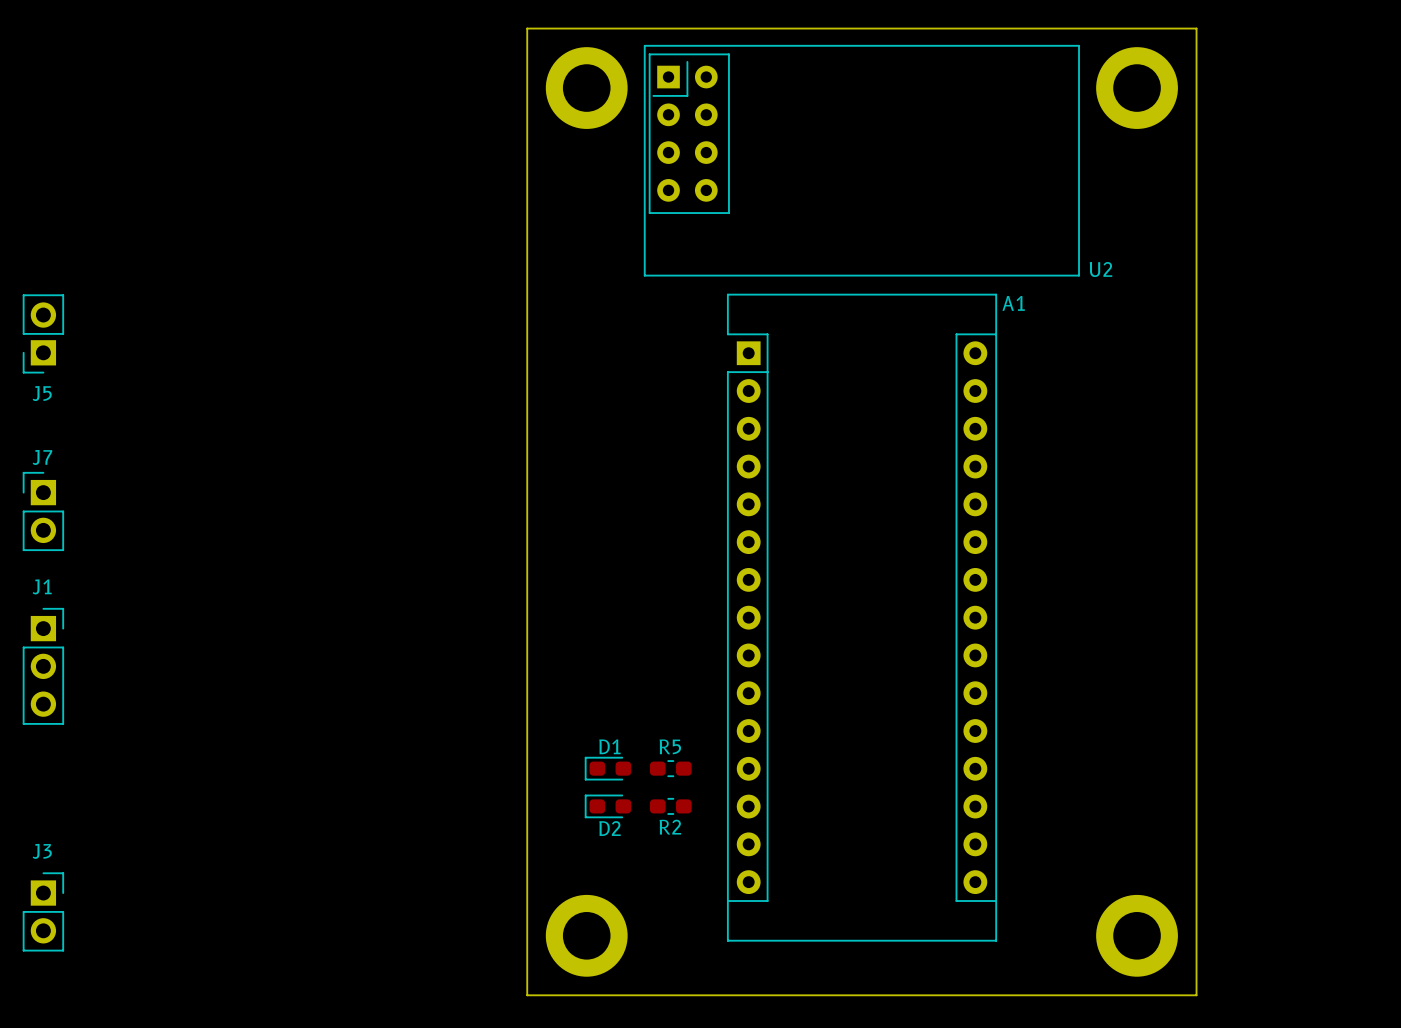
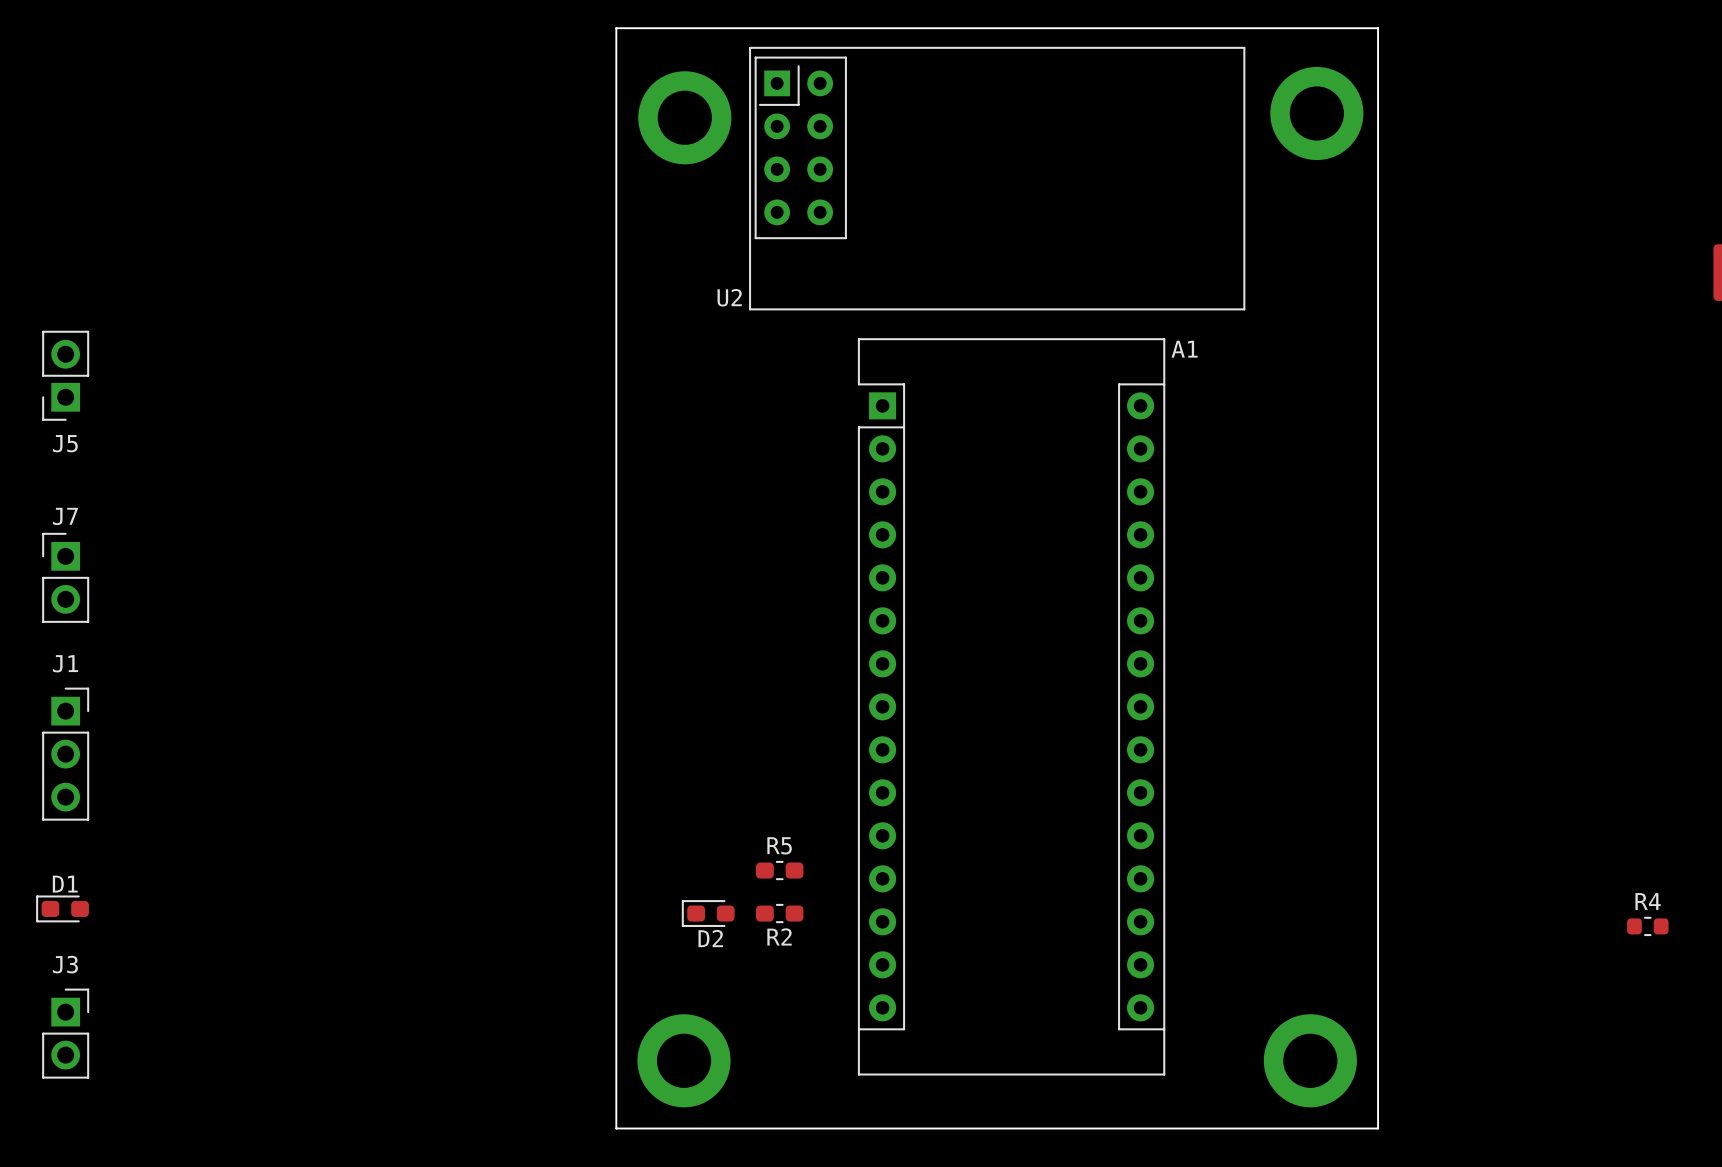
part position: (586, 88) -> (684, 117)
part position: (1137, 88) -> (1316, 113)
U2 name position: U2 (1100, 269) -> U2 (729, 297)
A1 position: (862, 617) -> (1011, 706)
D1 position: (607, 768) -> (62, 908)

